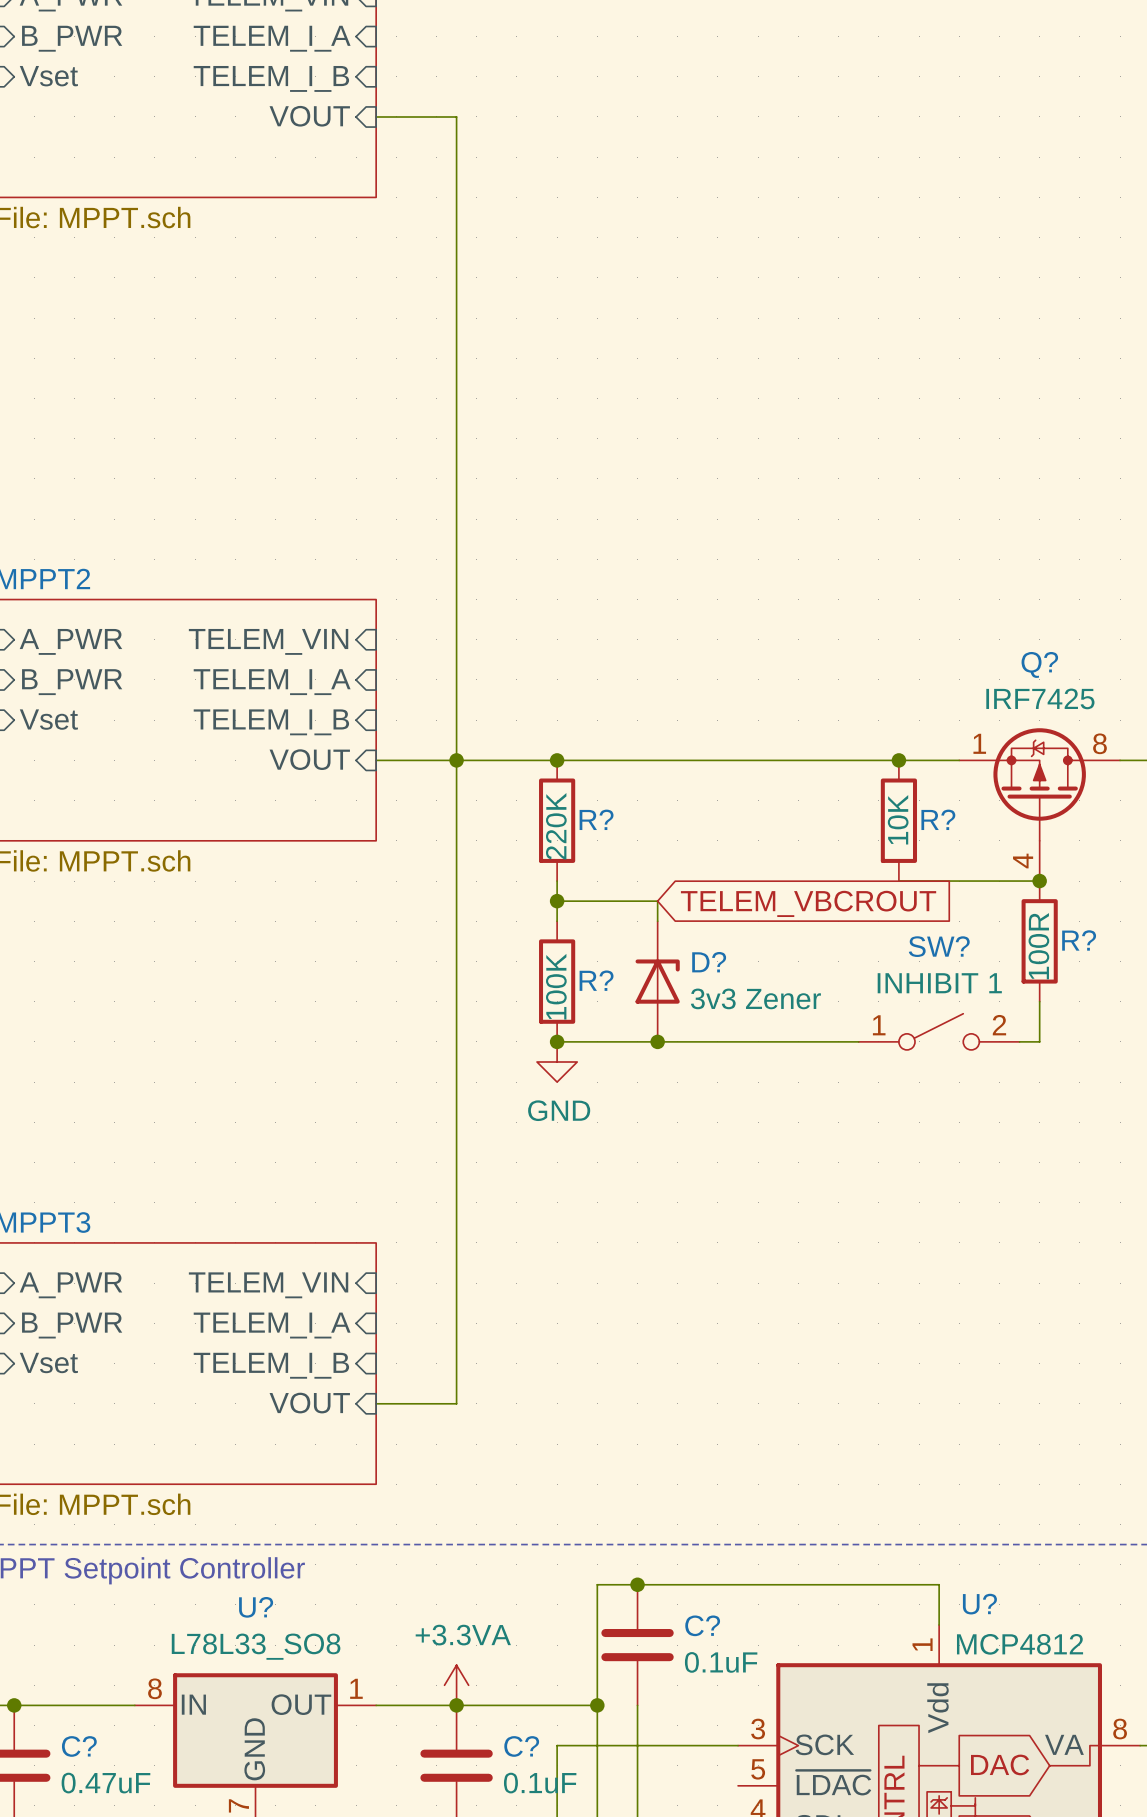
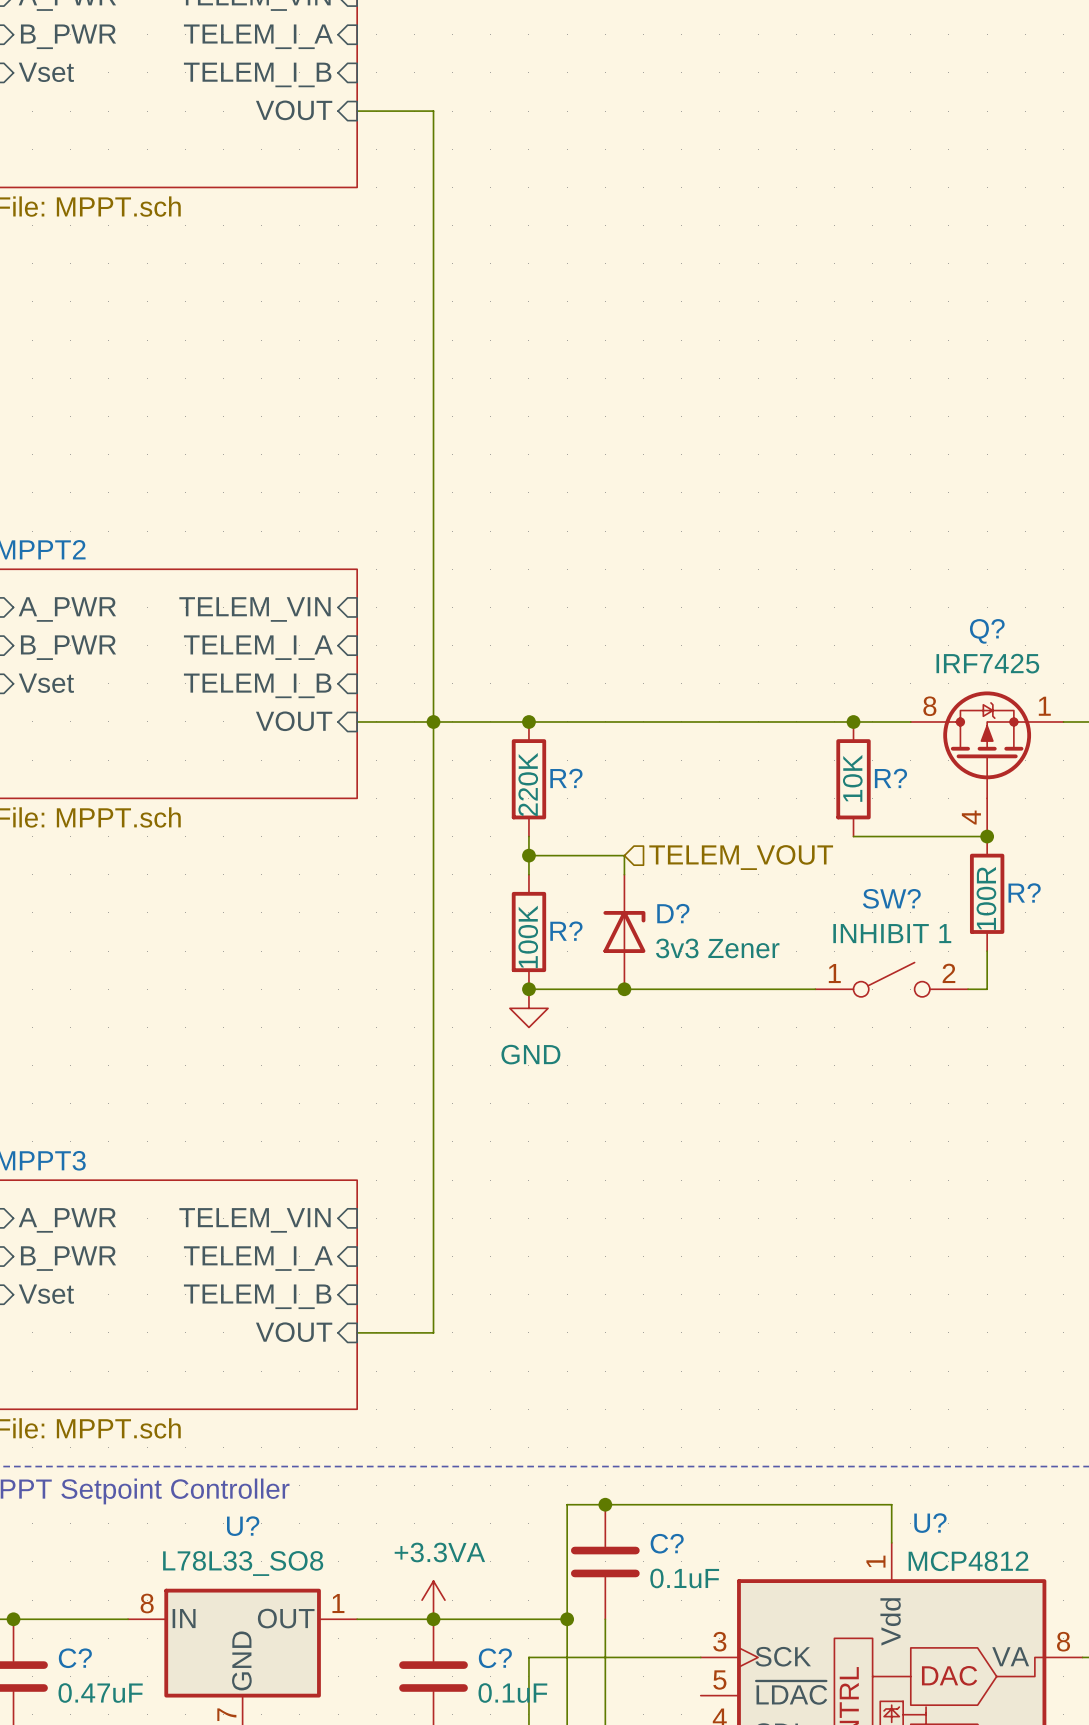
Q? flip: as is (1039, 784) -> left-right (987, 744)
hierarchical label: none -> TELEM_VOUT (741, 857)
global label: TELEM_VBCROUT (808, 903) -> none

